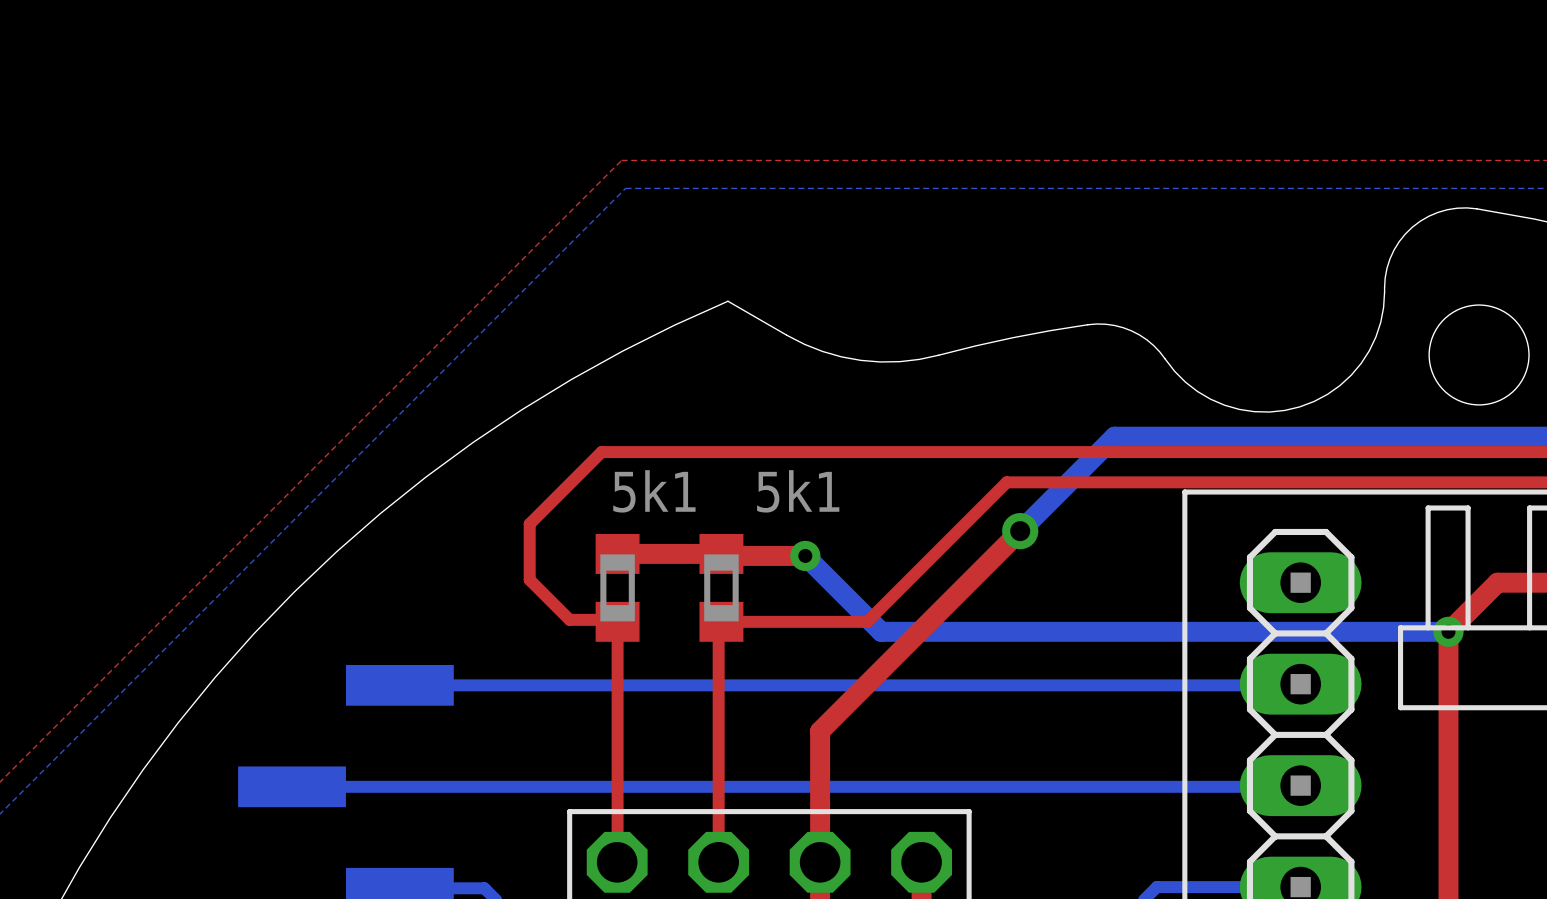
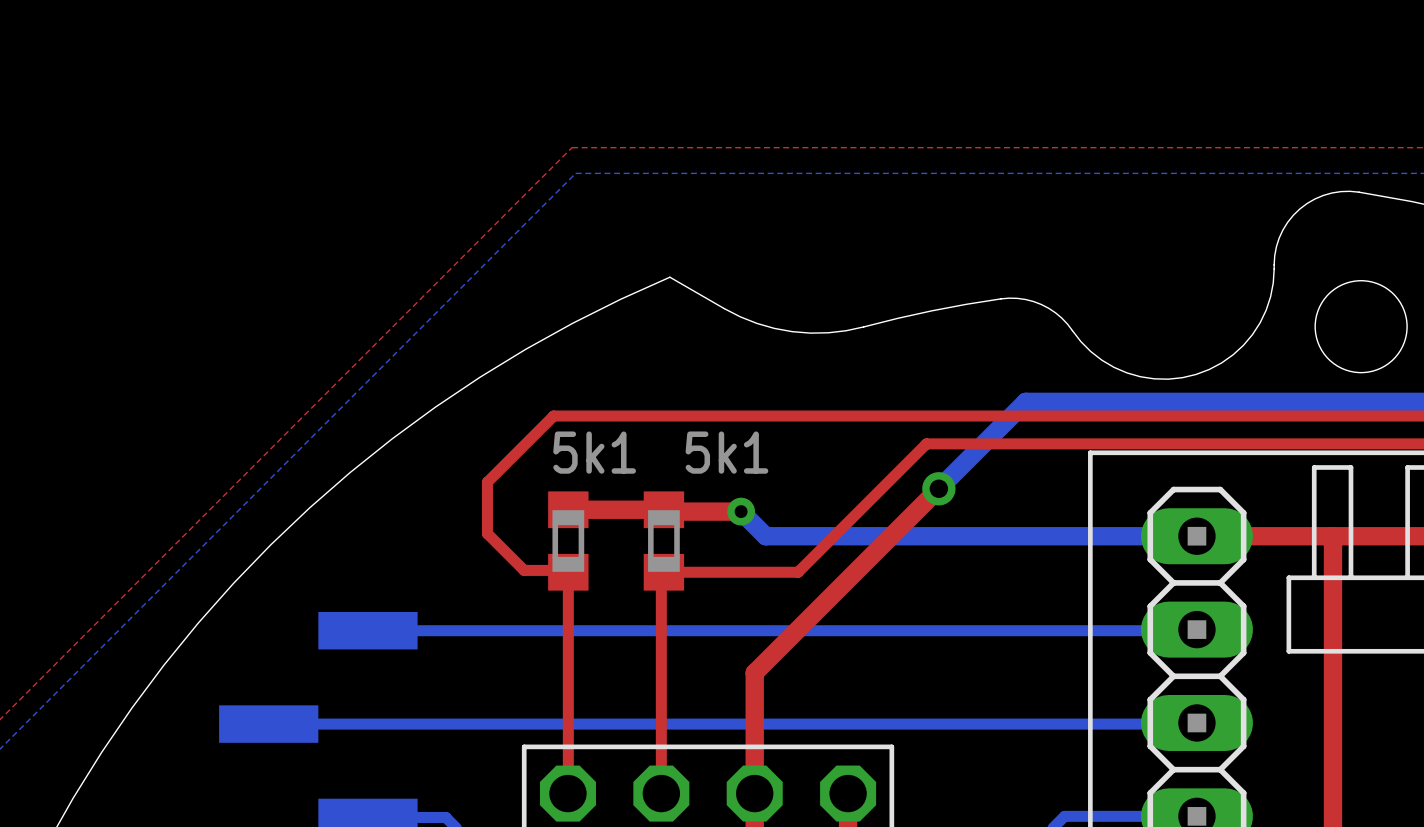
bottom track: (832, 582) (881, 631) (1448, 631) -> (765, 536) (1196, 536)
top track: none -> (1196, 536) (1378, 536)
top track: (1497, 582) (1448, 631) -> (1332, 536) (1332, 581)
via: (1448, 631) -> none

